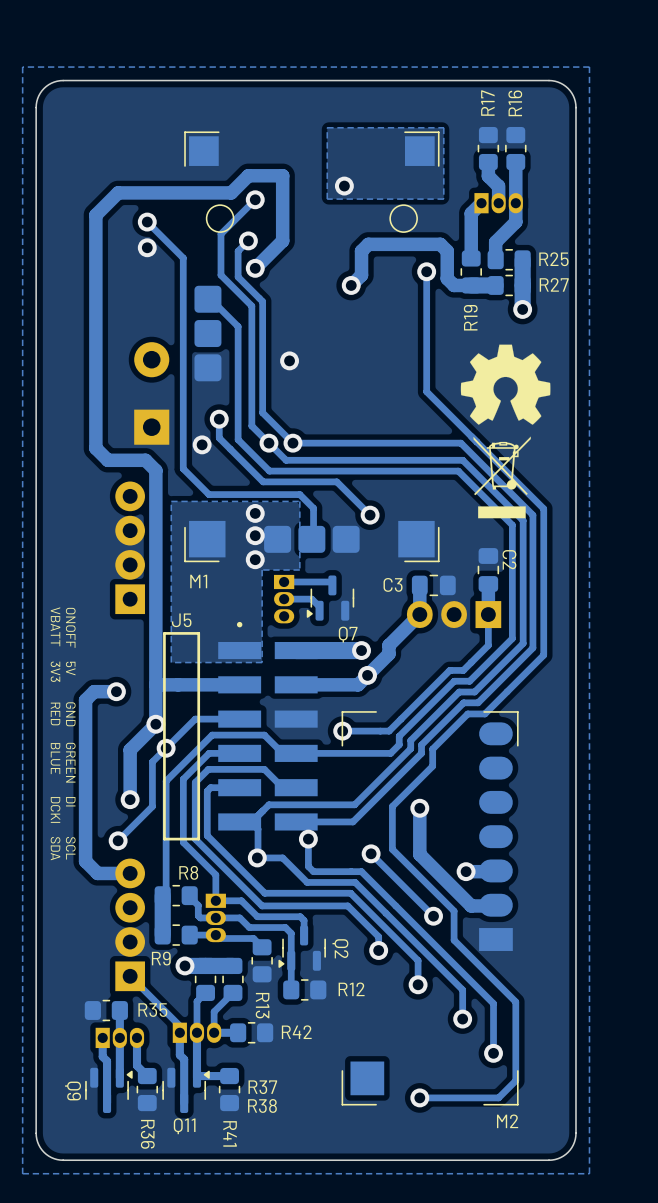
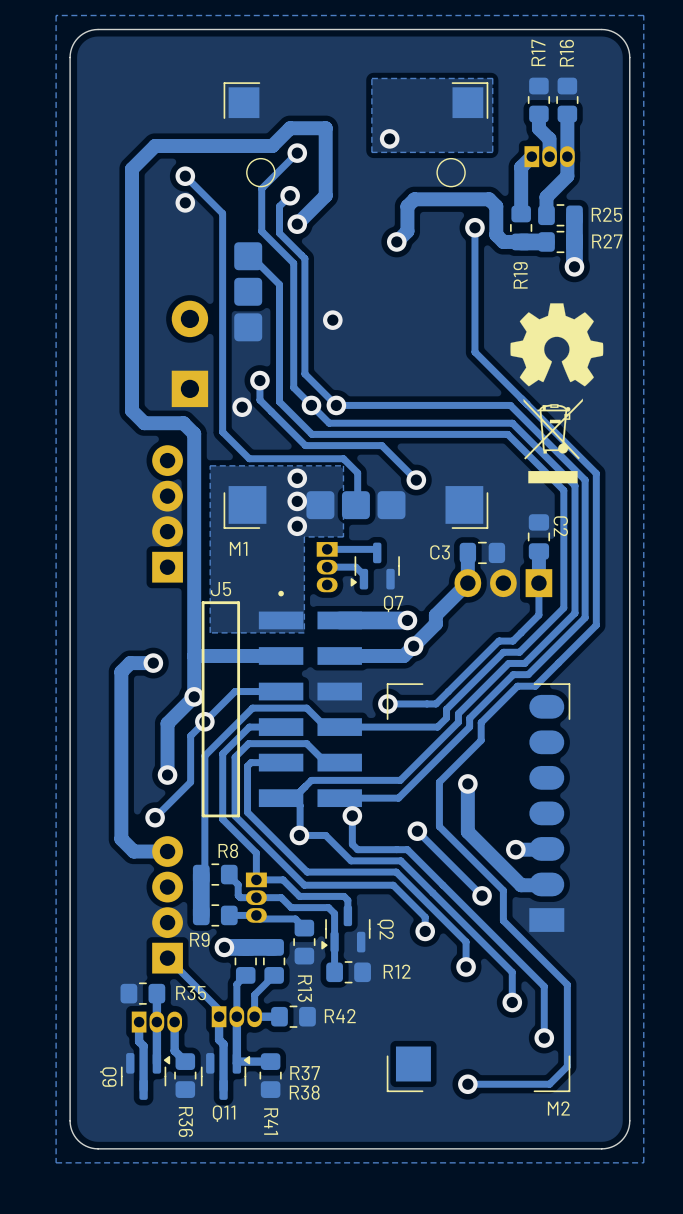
text: VBATT (55, 626) -> none
text: ONOFF (70, 627) -> none
text: 5V (70, 668) -> none
text: 3V3 (55, 671) -> none
text: RED (55, 713) -> none
text: GND (70, 714) -> none
text: BLUE (55, 758) -> none
text: GREEN (70, 762) -> none
text: DI (70, 801) -> none
text: DCKI (55, 809) -> none
text: SDA (55, 848) -> none
text: SCL (70, 848) -> none

